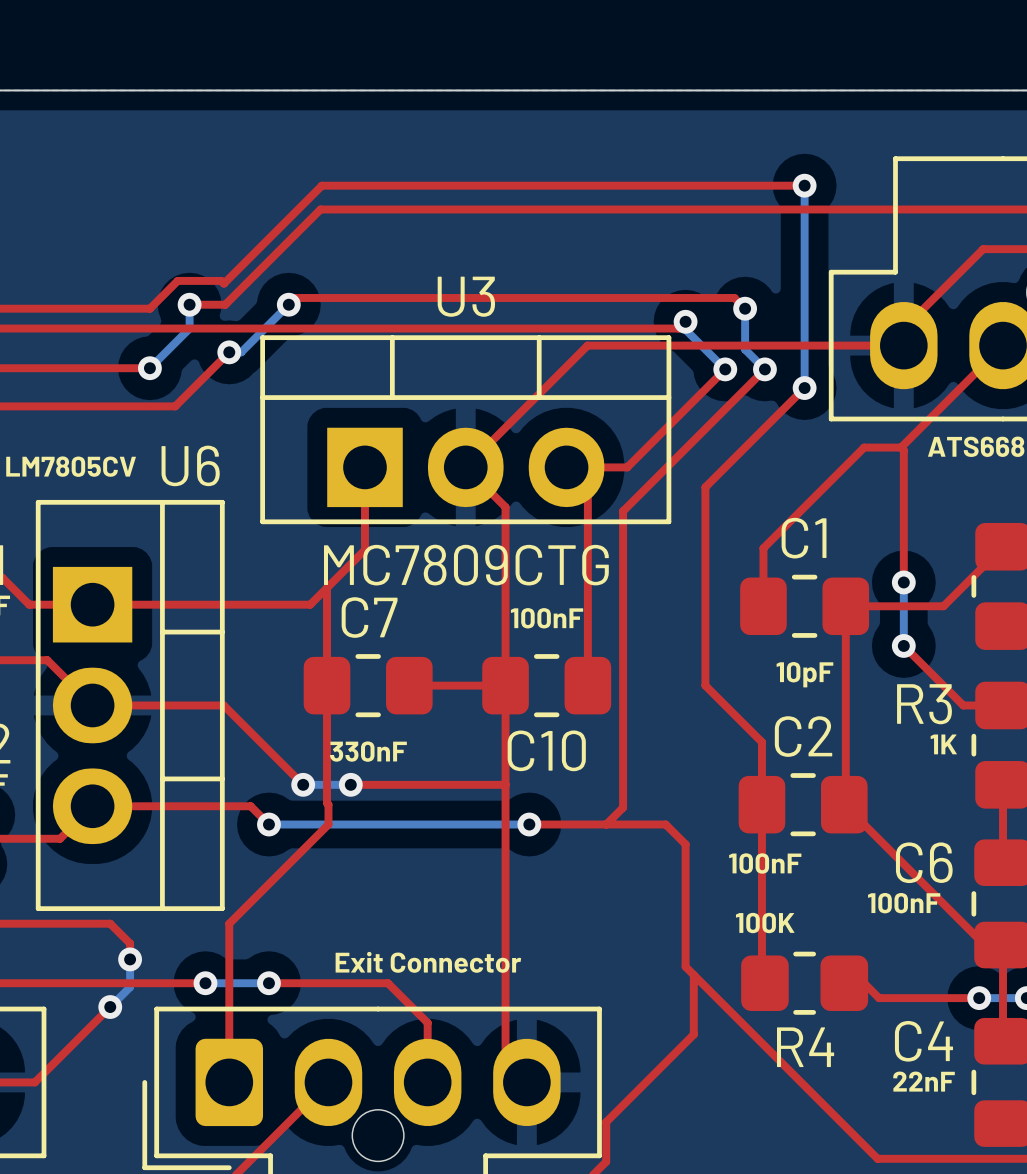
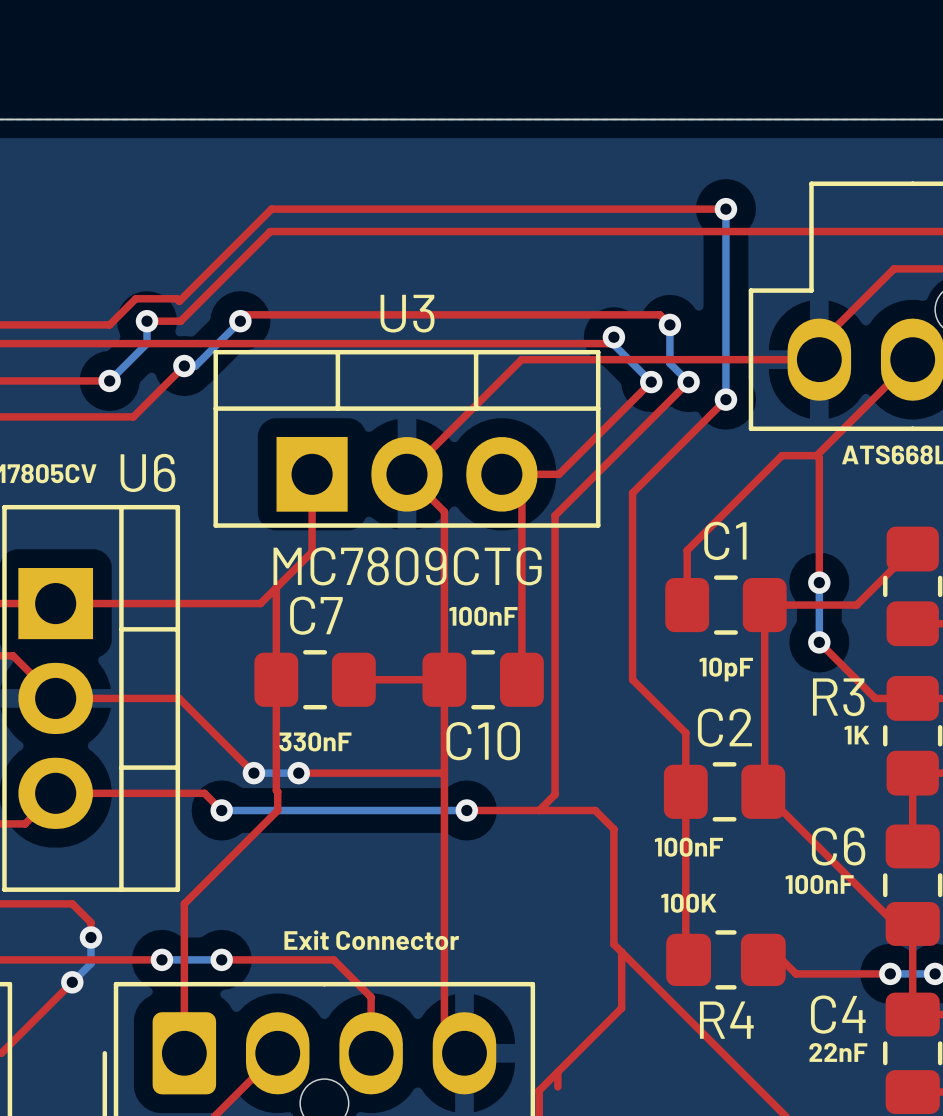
top track: none -> (557, 1071) (557, 1086)

